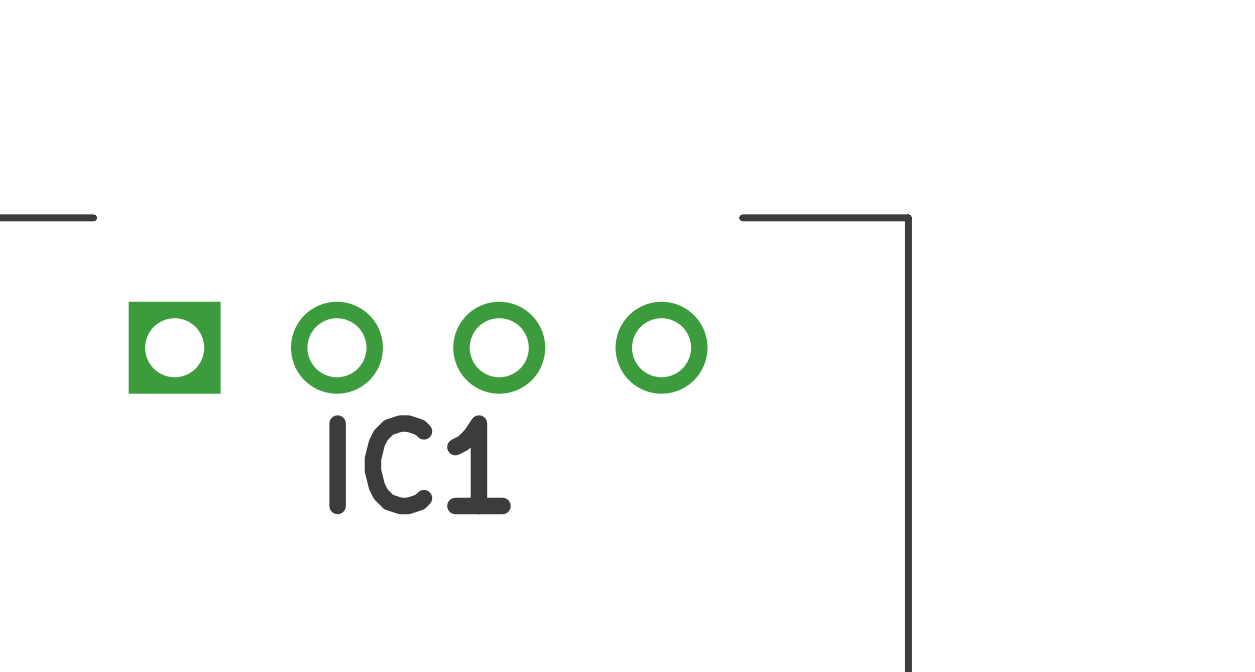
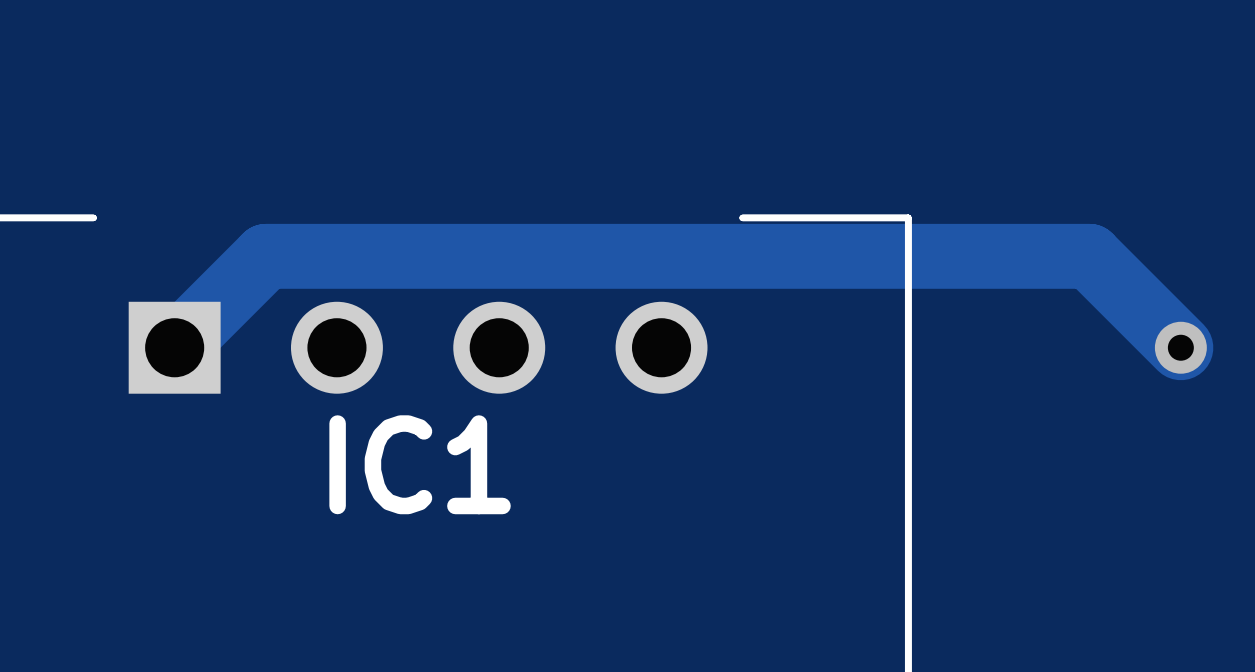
track: none -> (174, 347) (266, 256) (1089, 256) (1180, 347)
via: none -> (1180, 347)

